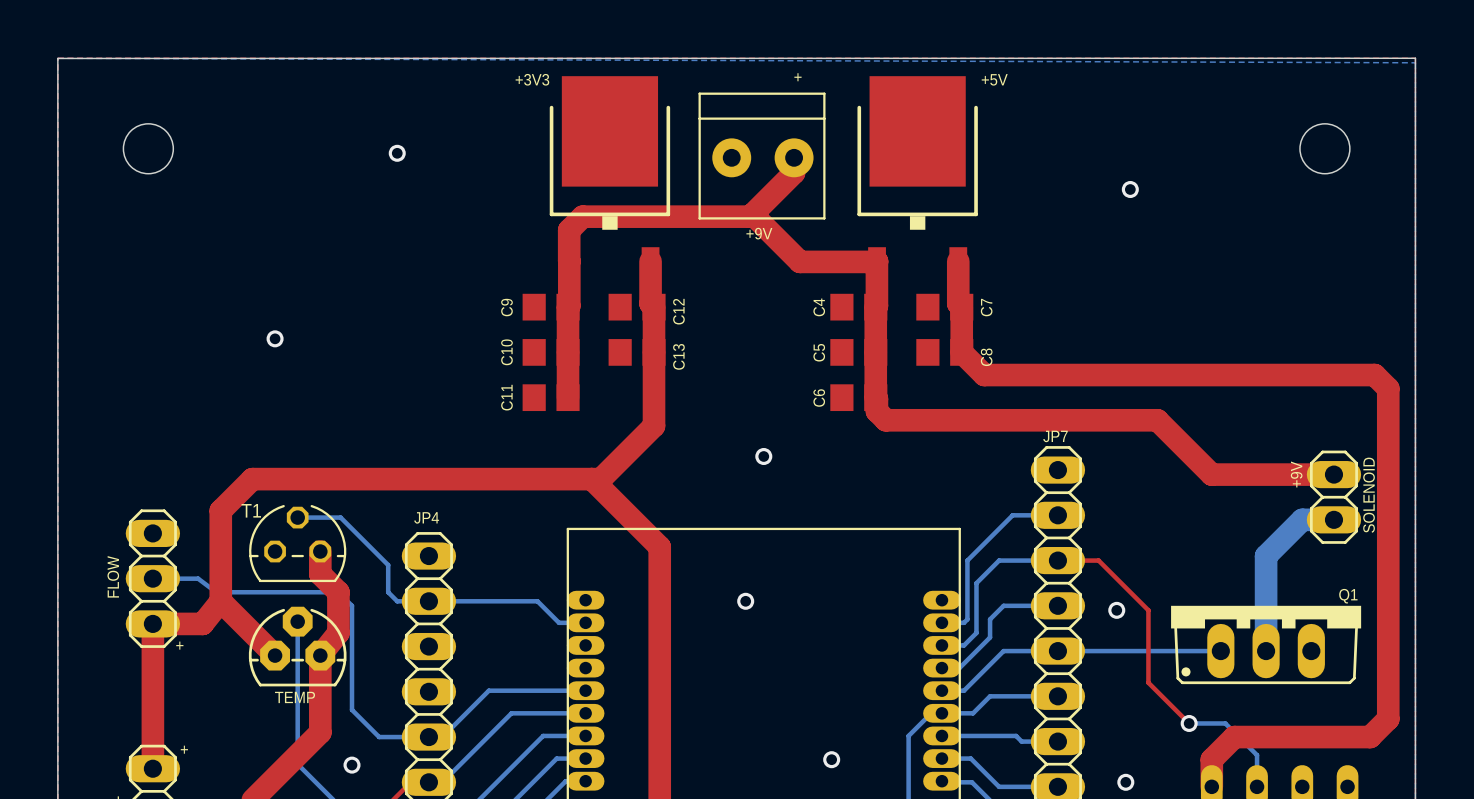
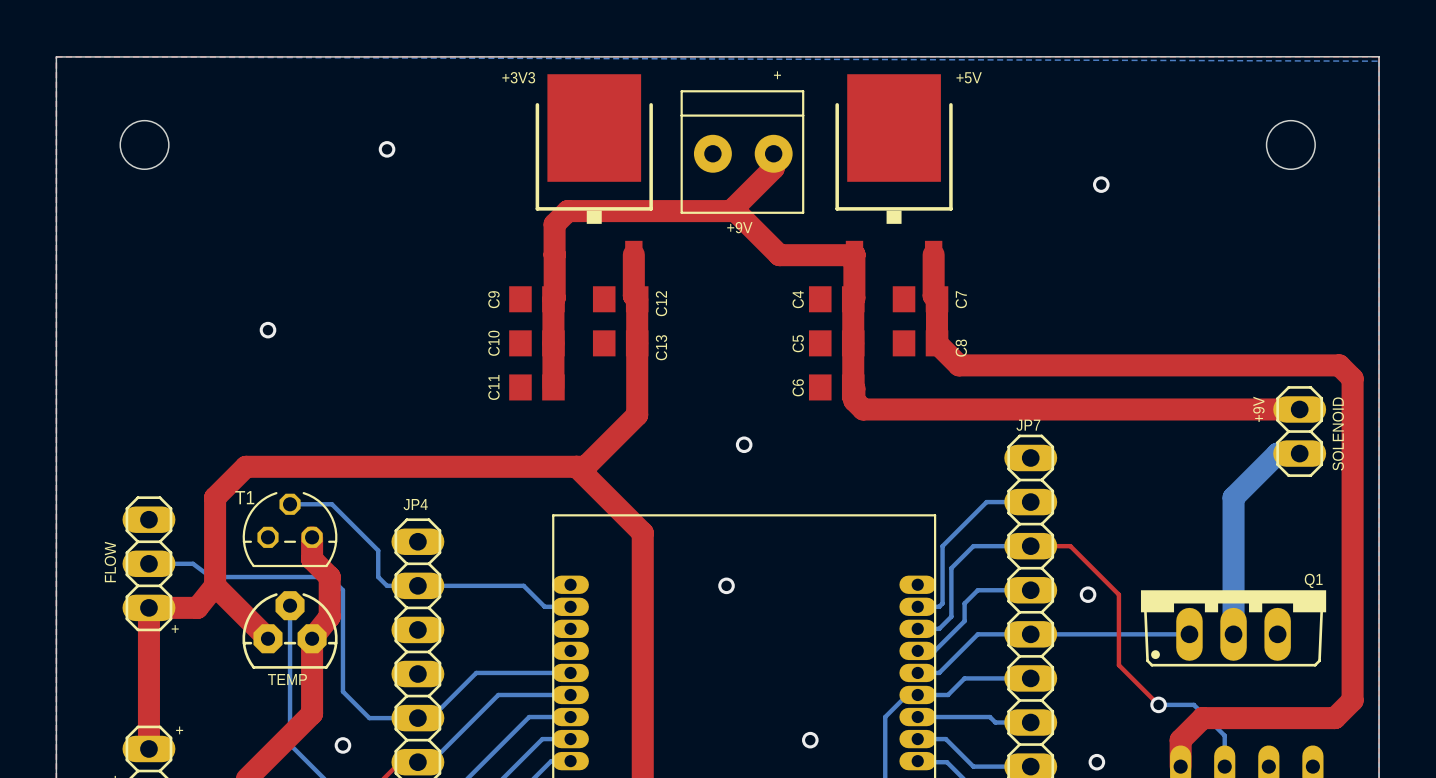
top track: (1157, 420) (1211, 474) (1333, 474) -> (1127, 409) (1299, 409)
text position: +9V (1296, 474) -> +9V (1258, 409)
text position: SOLENOID (1369, 495) -> SOLENOID (1338, 433)
part position: (1333, 497) -> (1299, 431)
bottom track: (1333, 519) (1302, 519) (1266, 556) -> (1299, 453) (1277, 453) (1233, 497) (1233, 541)

